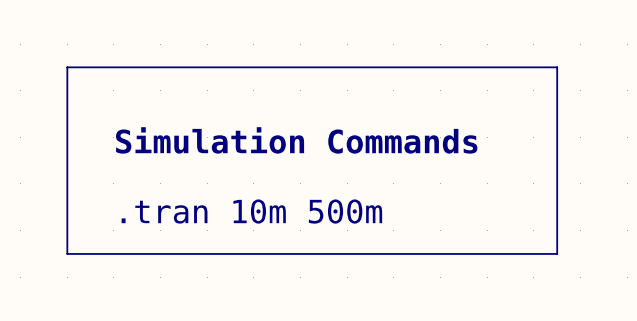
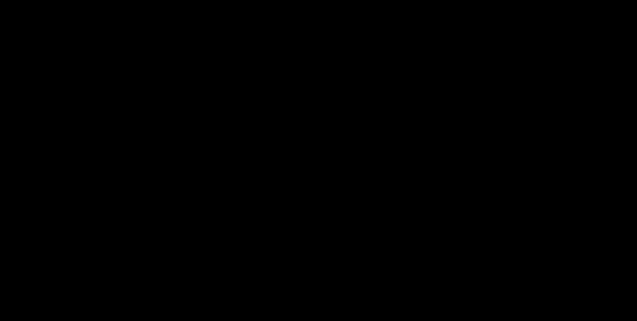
line: (67, 67) (67, 253) (557, 253) (557, 67) (67, 67) -> none
text: Simulation Commands (296, 140) -> none
text: .tran 10m 500m (251, 211) -> none

